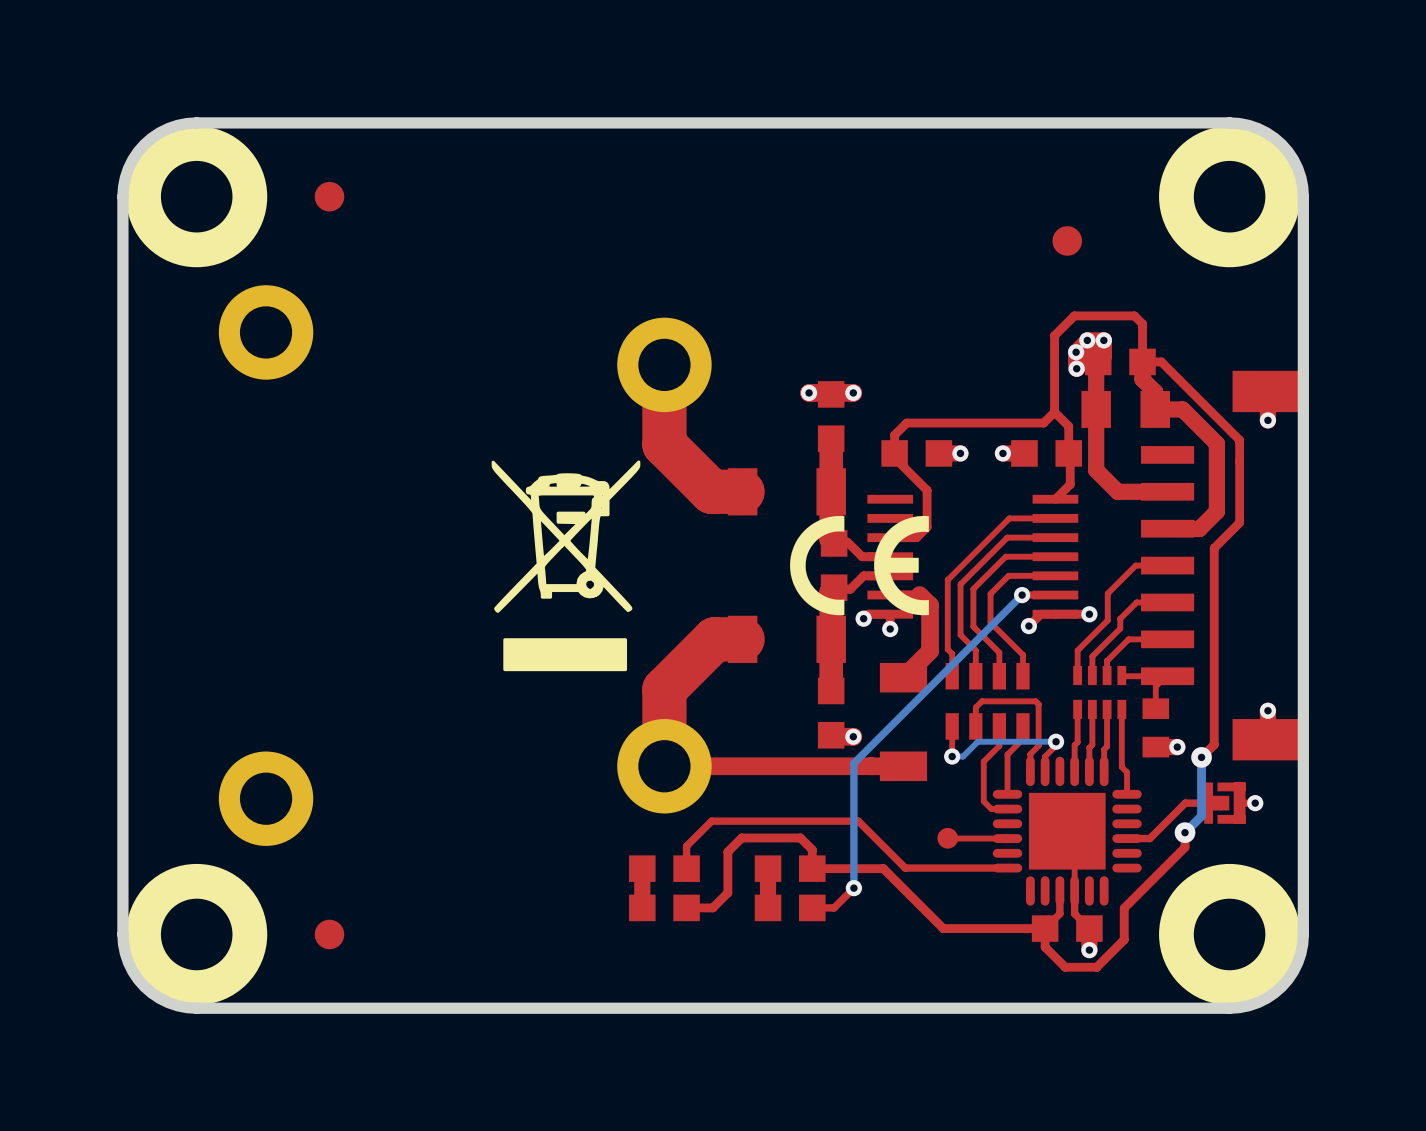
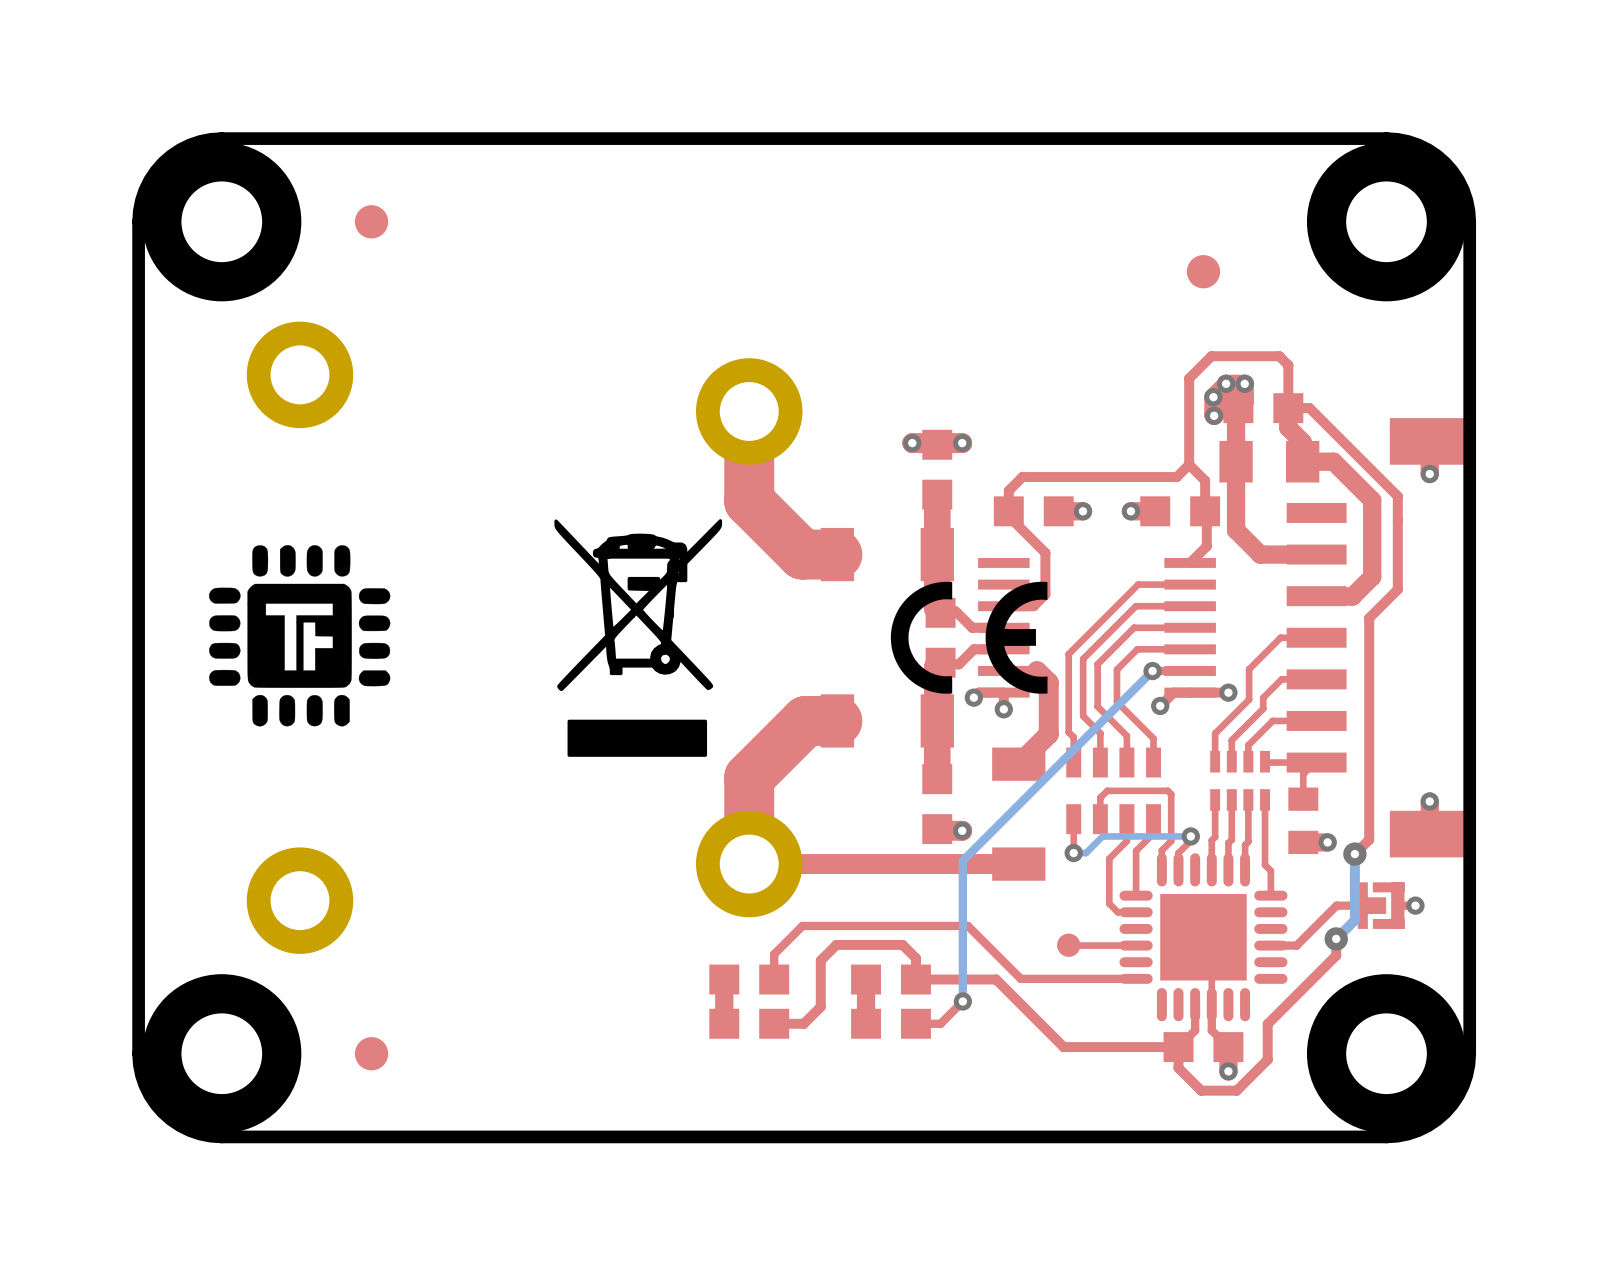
drawing: none -> [209, 545, 391, 727]

